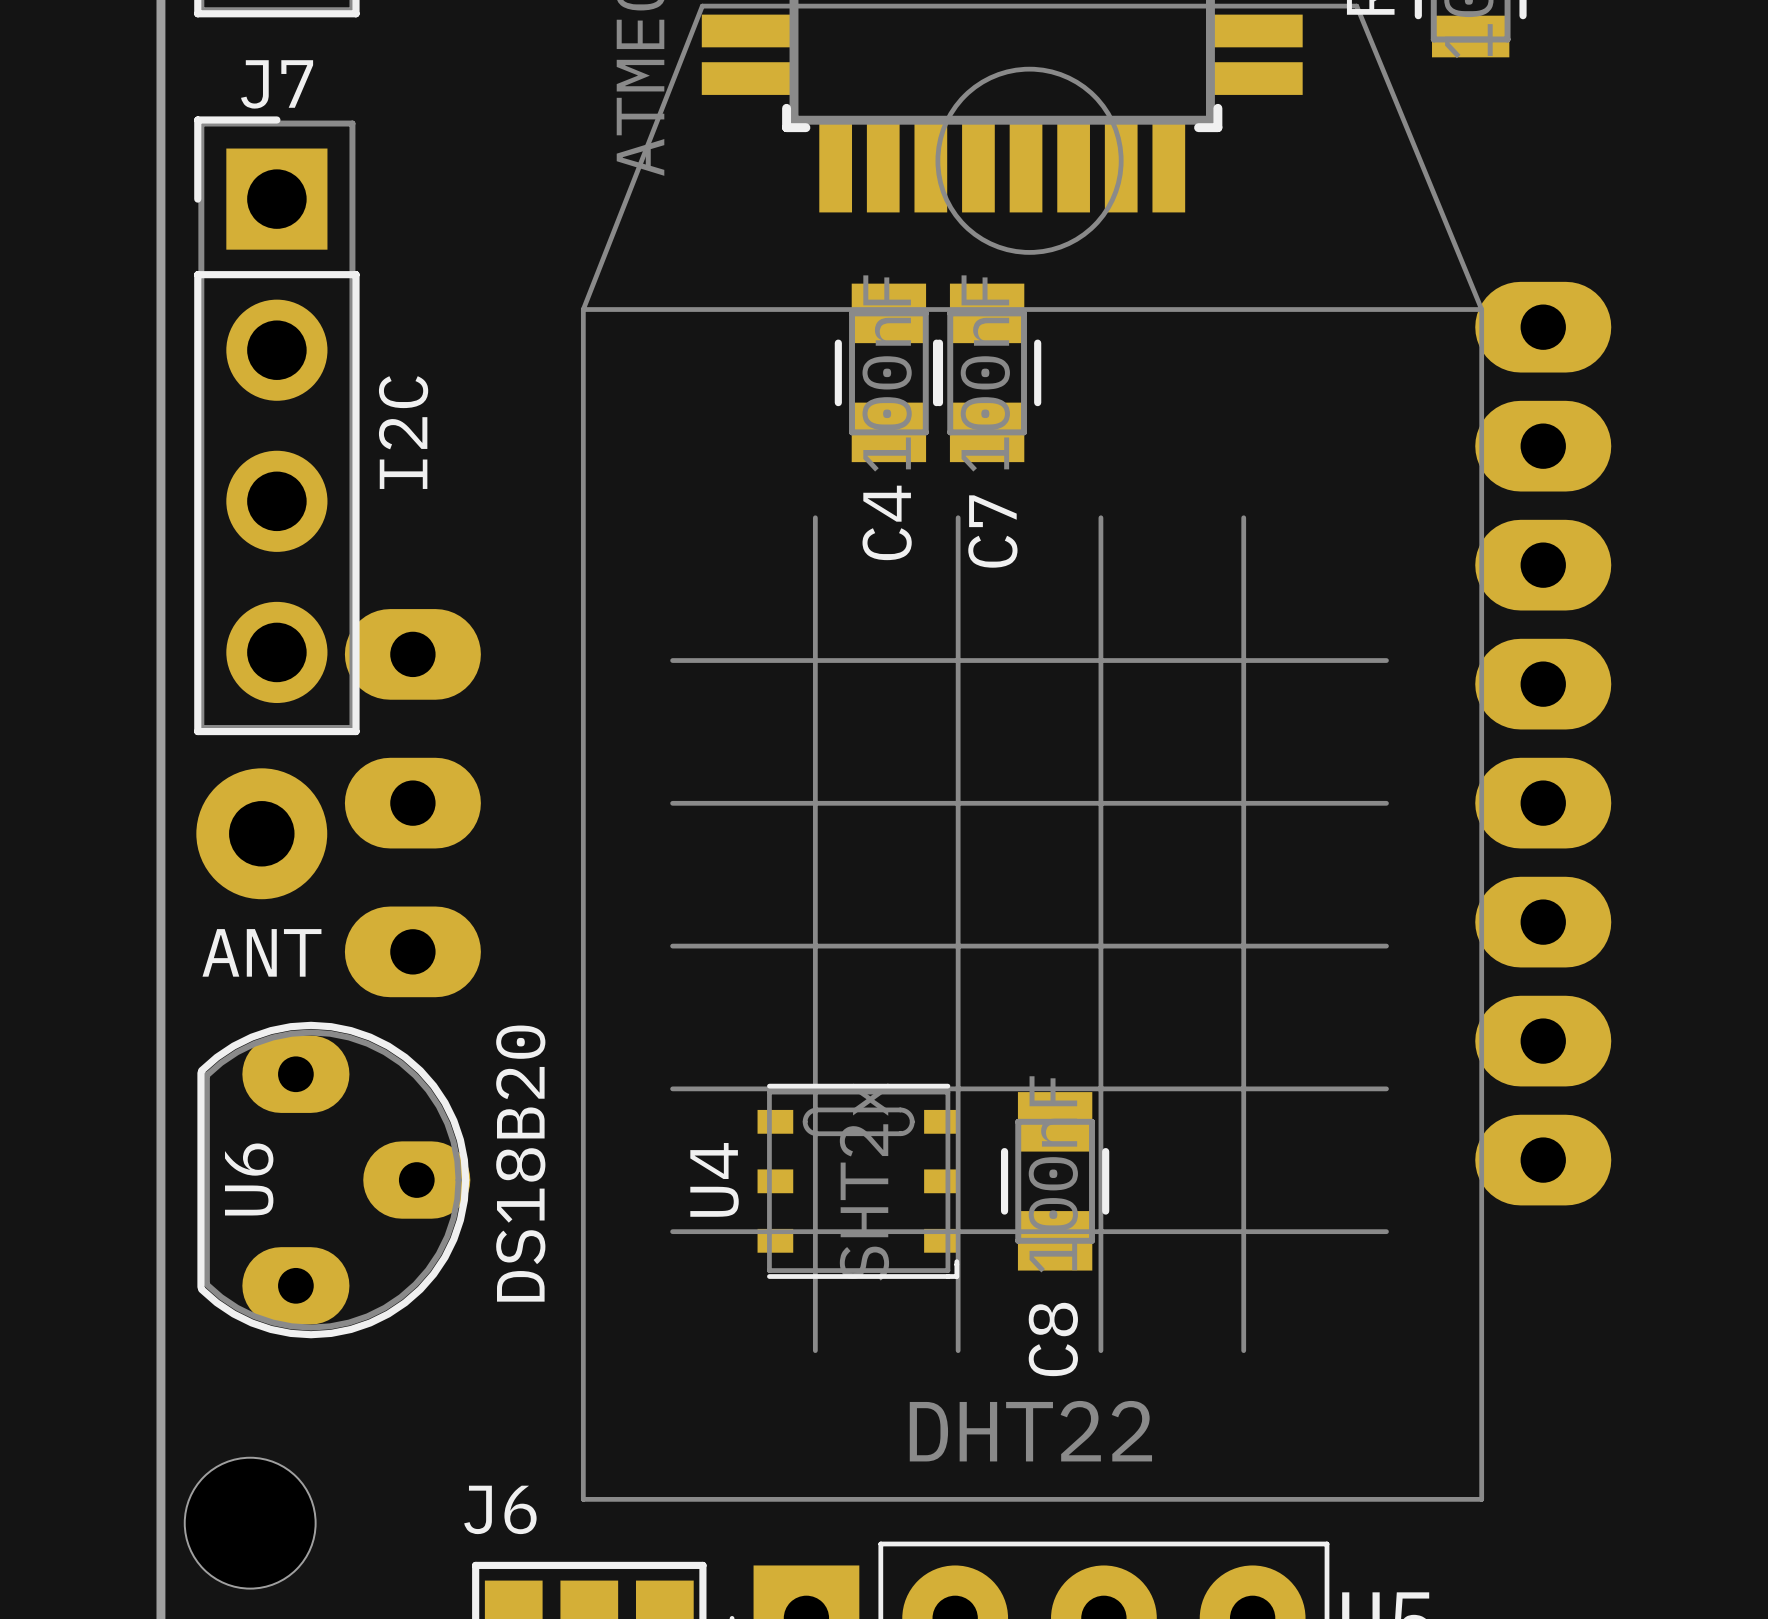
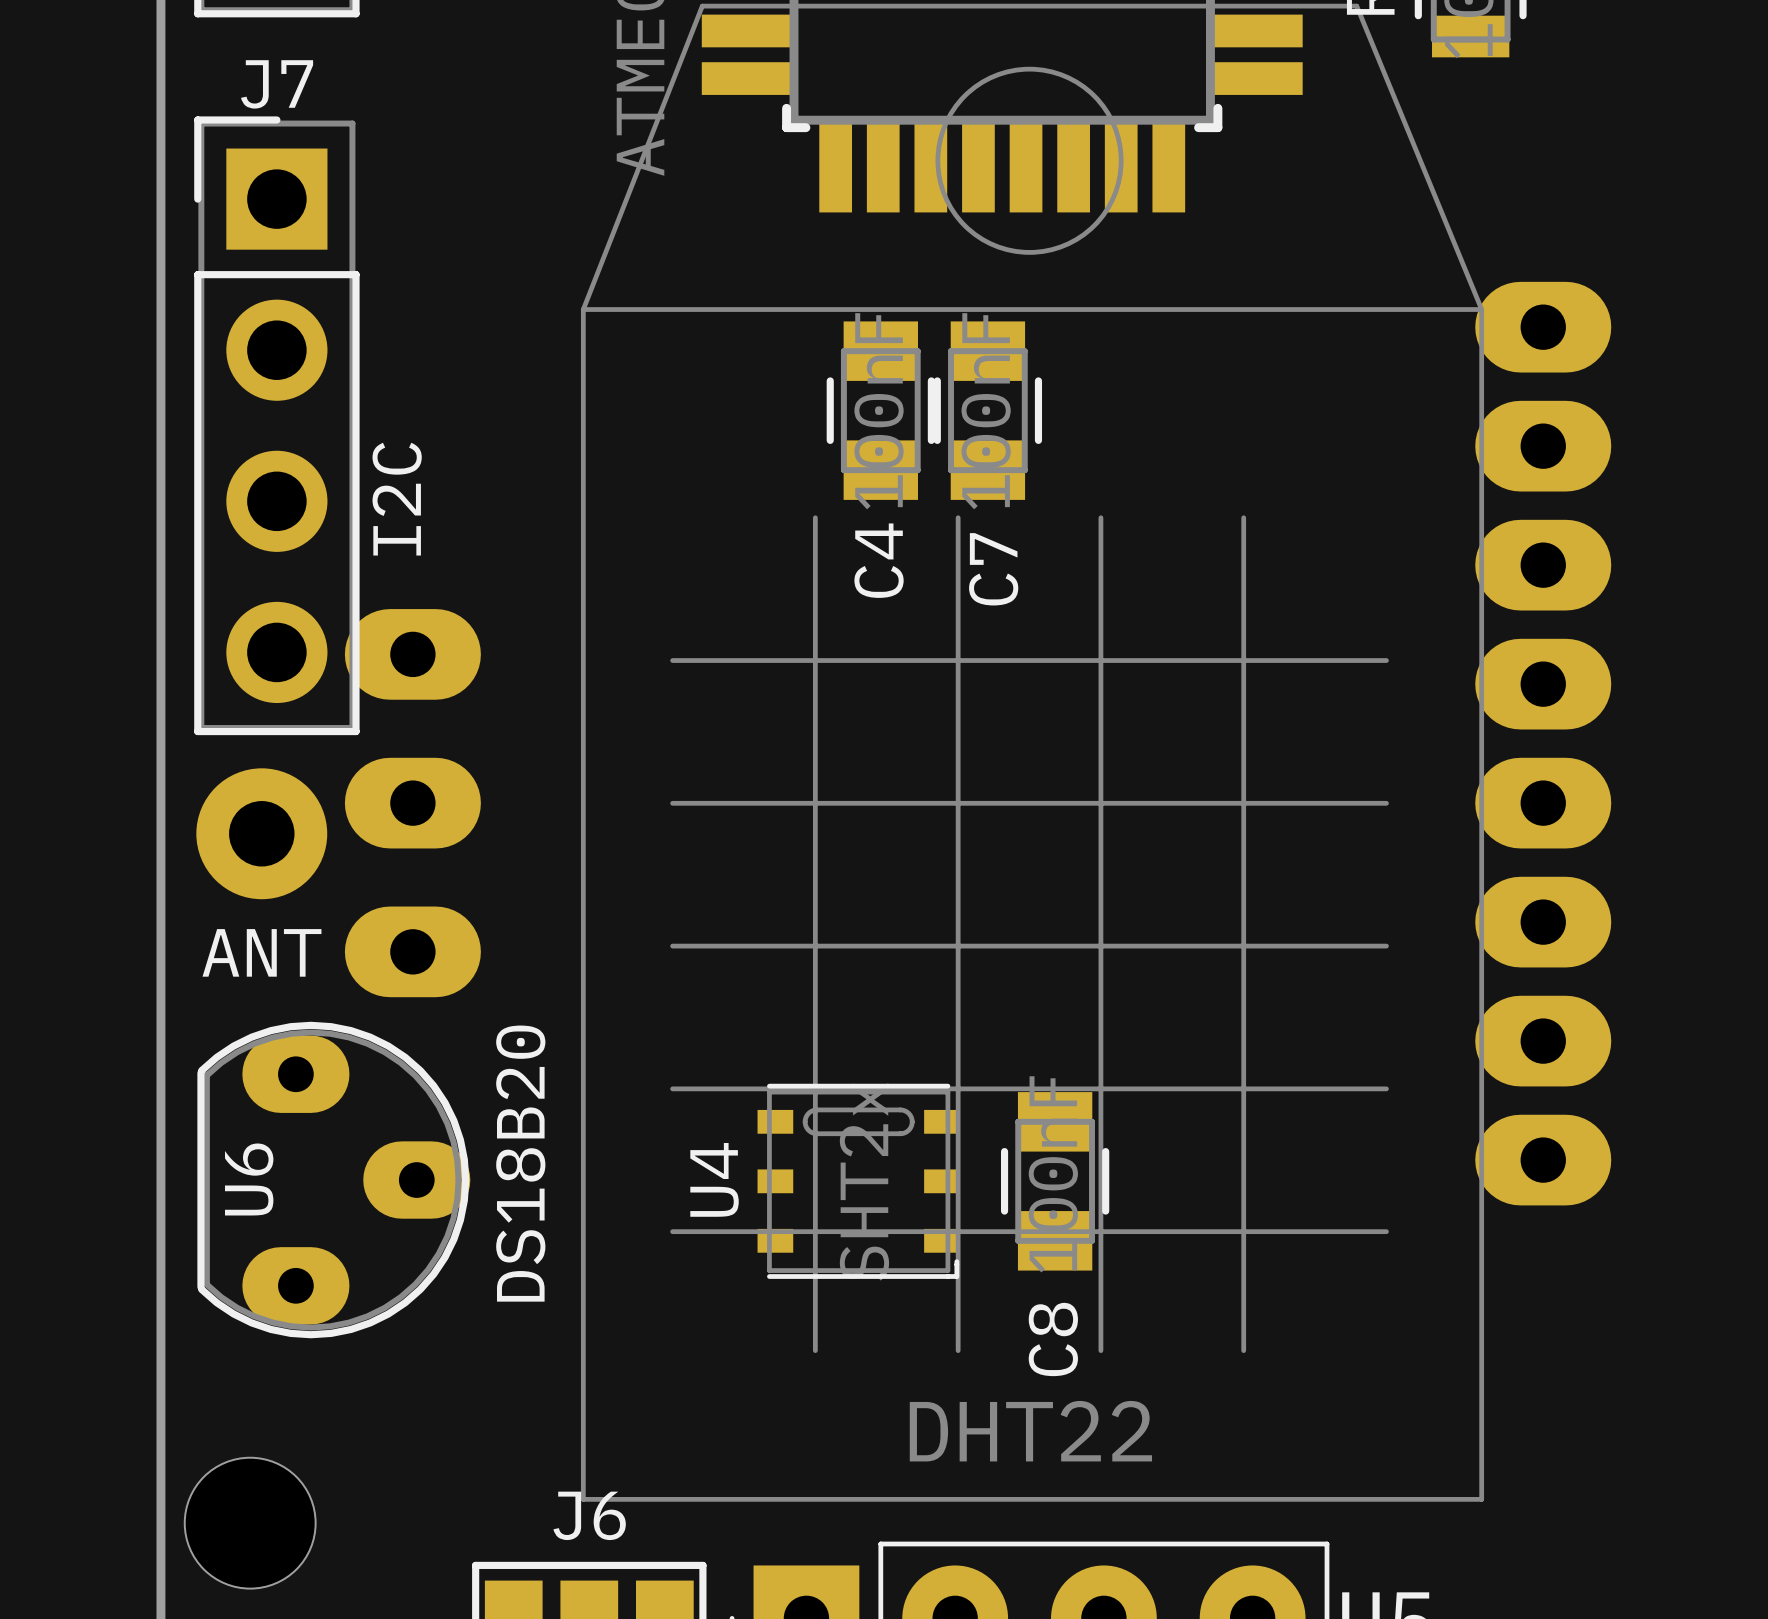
C4 position: (888, 372) -> (880, 410)
C7 position: (987, 372) -> (987, 410)
J7 value position: I2C (403, 432) -> I2C (397, 499)
J6 name position: J6 (500, 1509) -> J6 (589, 1515)

